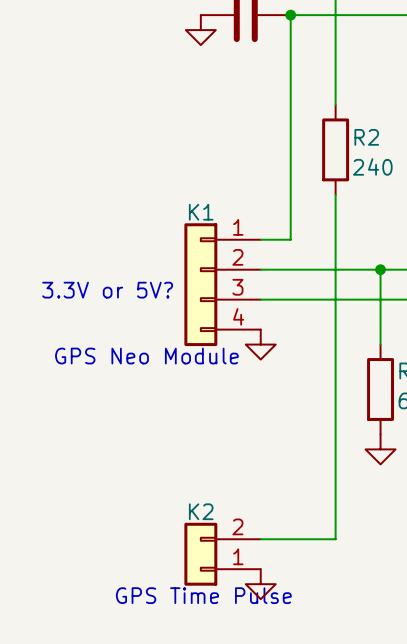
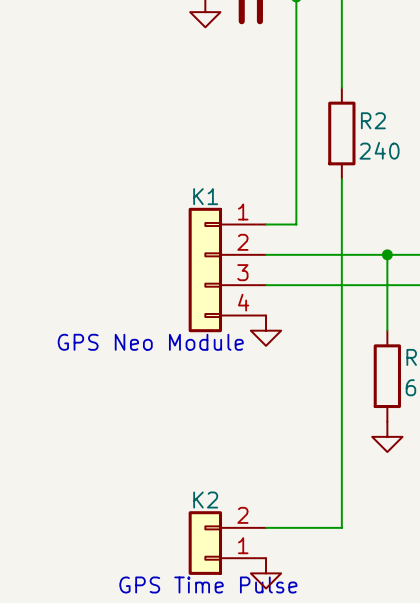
text: 3.3V or 5V? (107, 290) -> none

